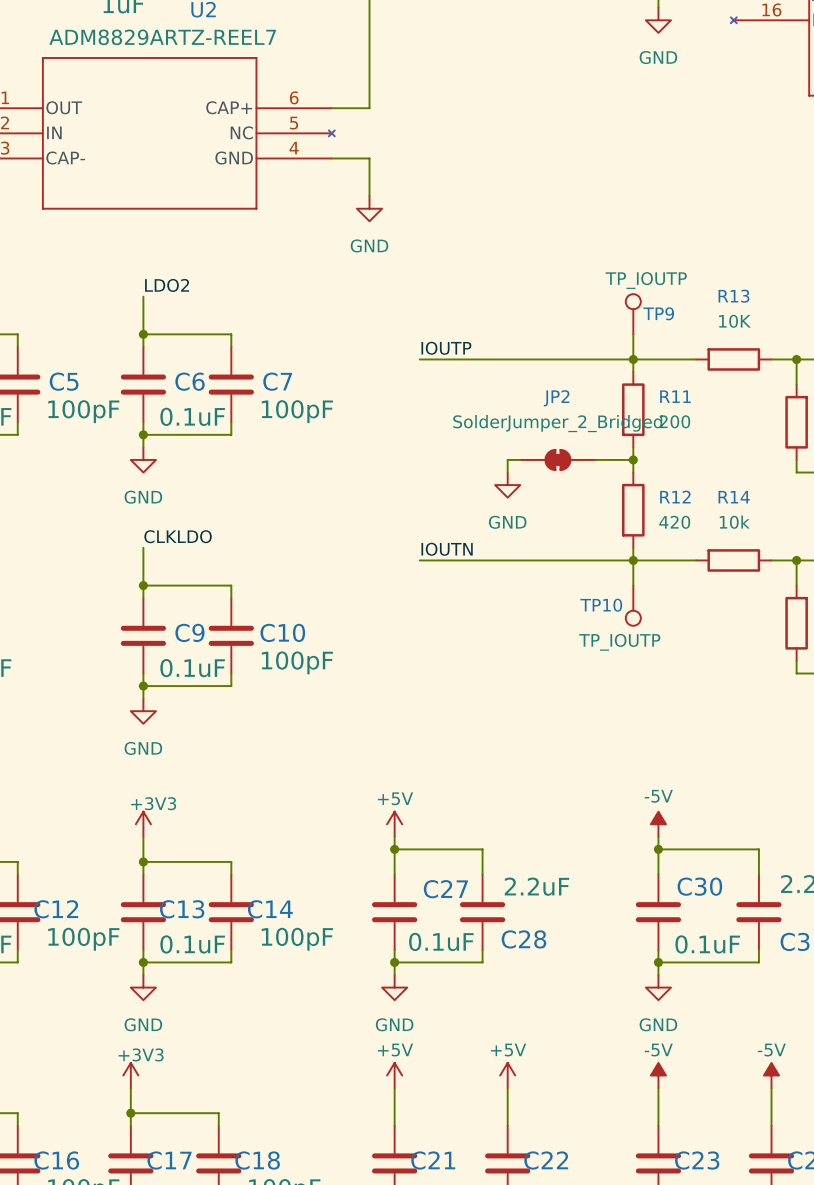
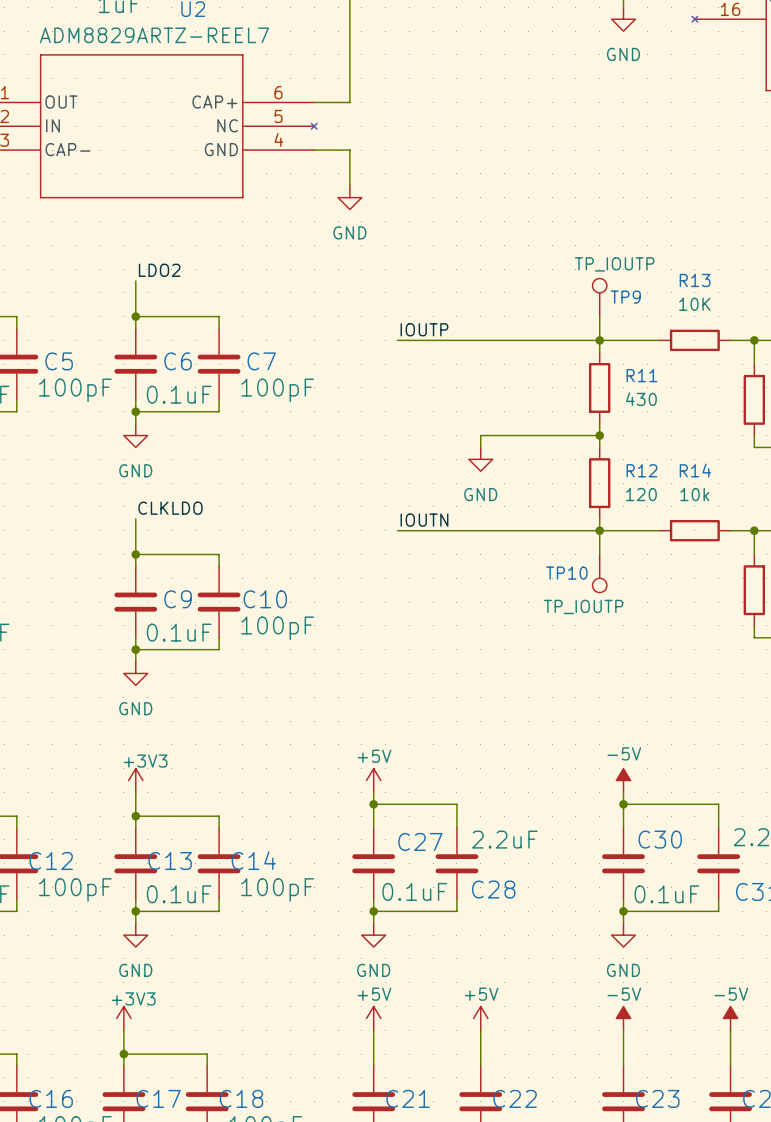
R11 value: 200 (674, 421) -> 430 (641, 399)
JP2: SolderJumper_2_Bridged (557, 459) -> none
R12 value: 420 (674, 522) -> 120 (641, 494)

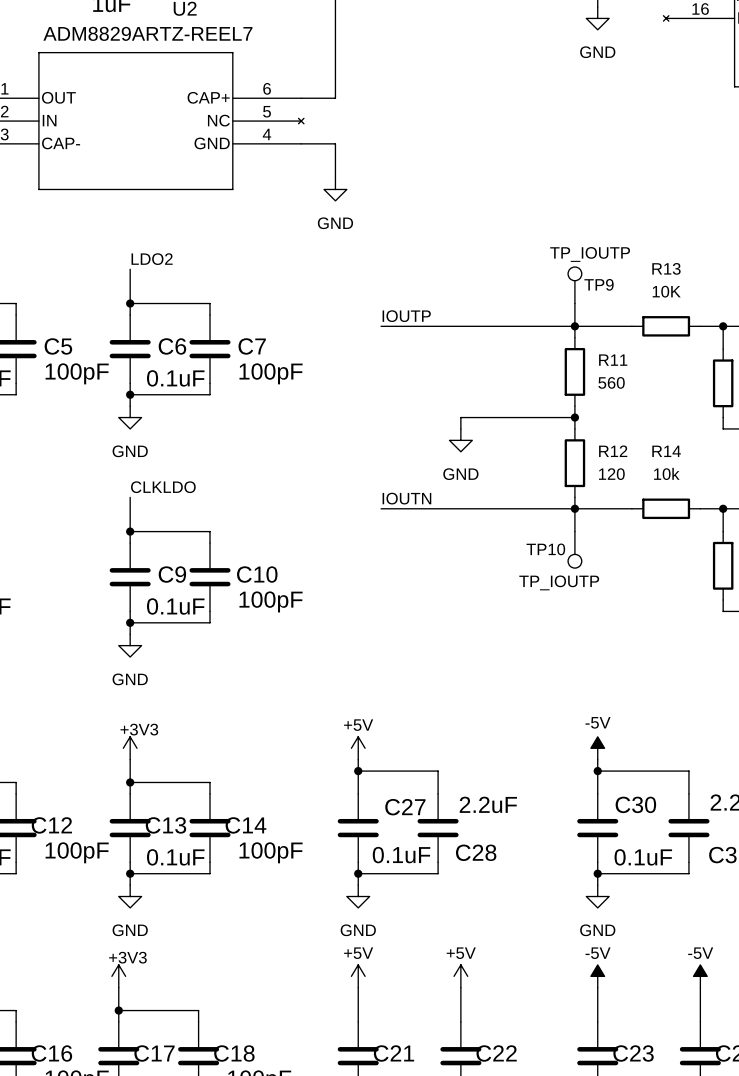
R11 value: 430 (641, 399) -> 560 (611, 382)

